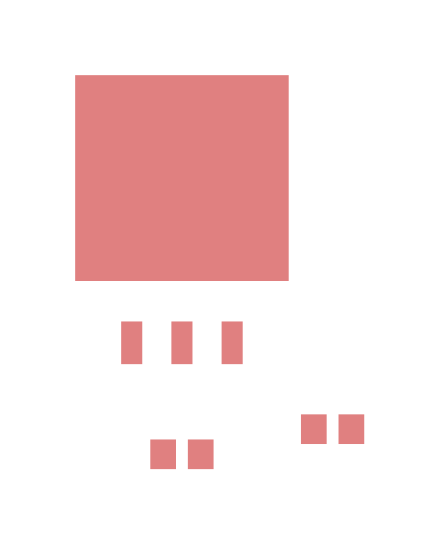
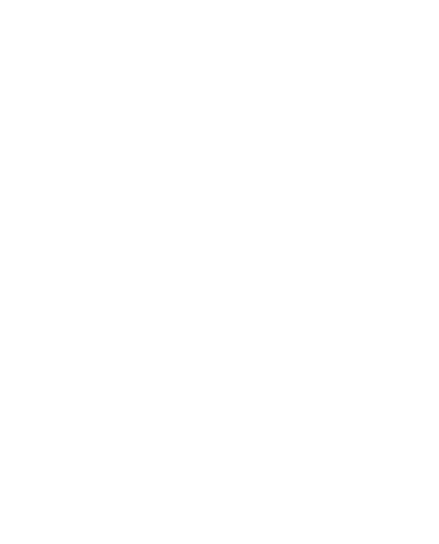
part: (181, 219) -> none
part: (332, 429) -> none
part: (181, 454) -> none

